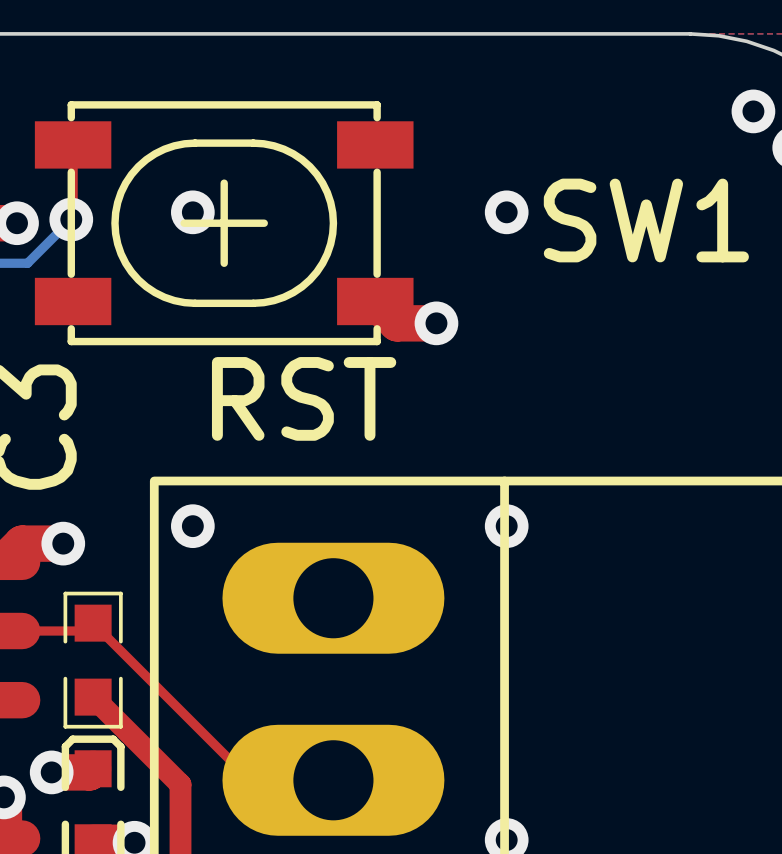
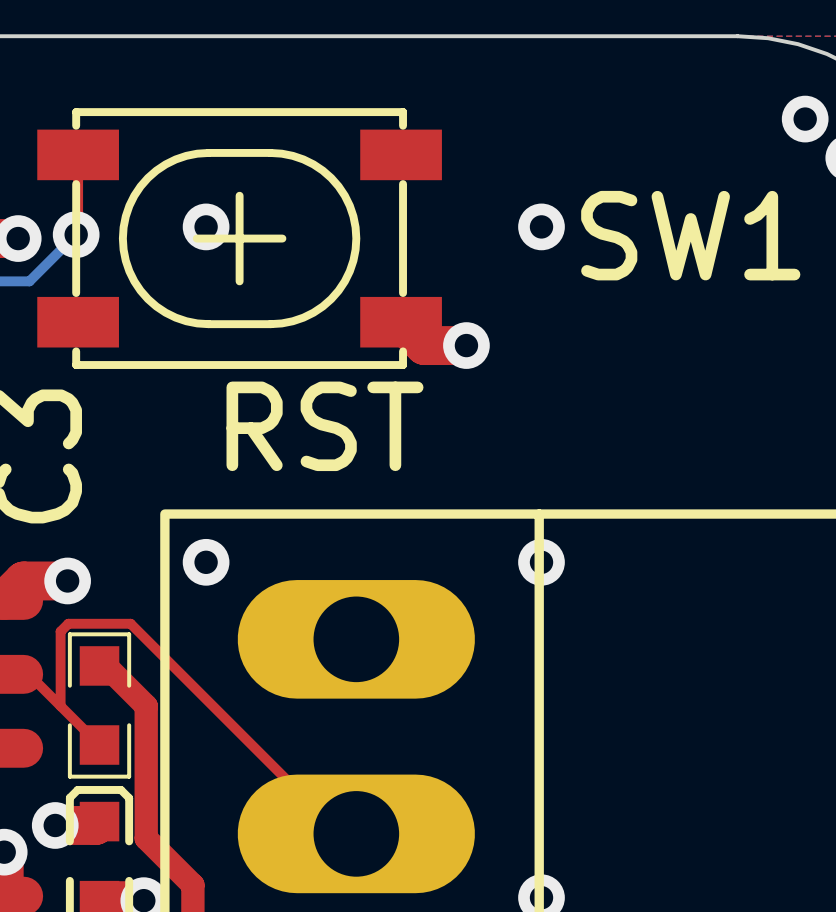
top track: (27, 631) (85, 631) (93, 623) (250, 780) (318, 780) -> (60, 706) (60, 631) (68, 623) (130, 623) (340, 833)
top track: none -> (28, 674) (99, 745)
top track: (93, 697) (180, 784) (180, 828) -> (106, 665) (146, 706) (146, 838) (192, 885)

